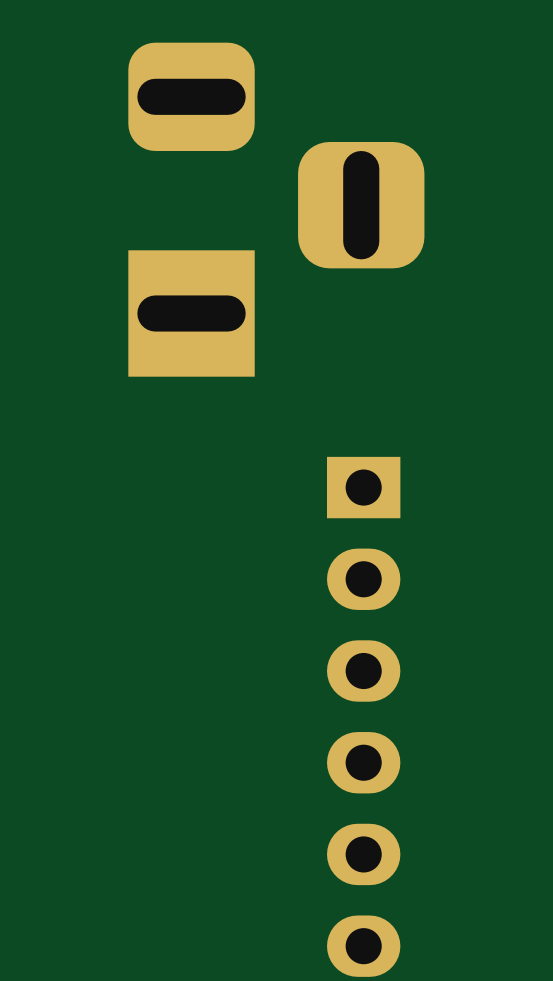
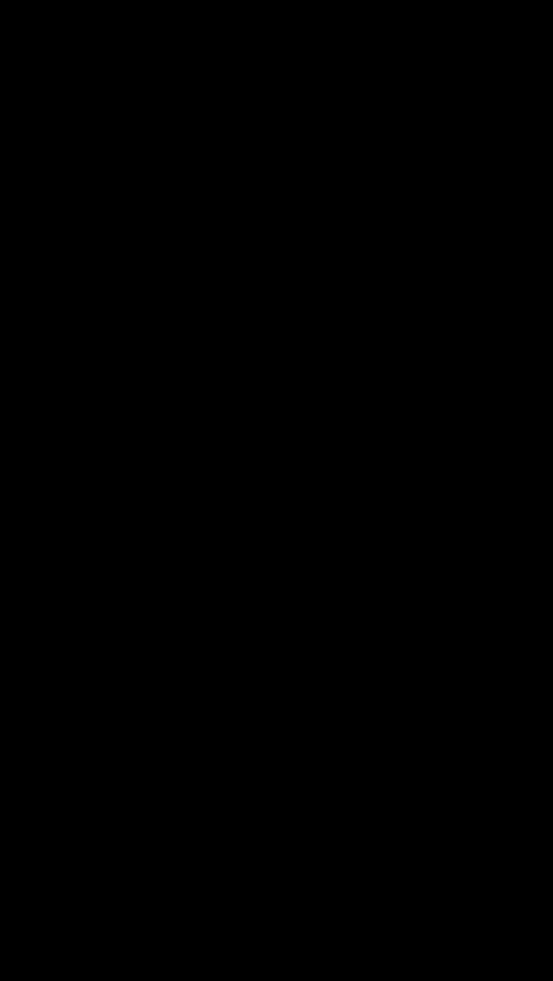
part: (276, 209) -> none
part: (363, 716) -> none

